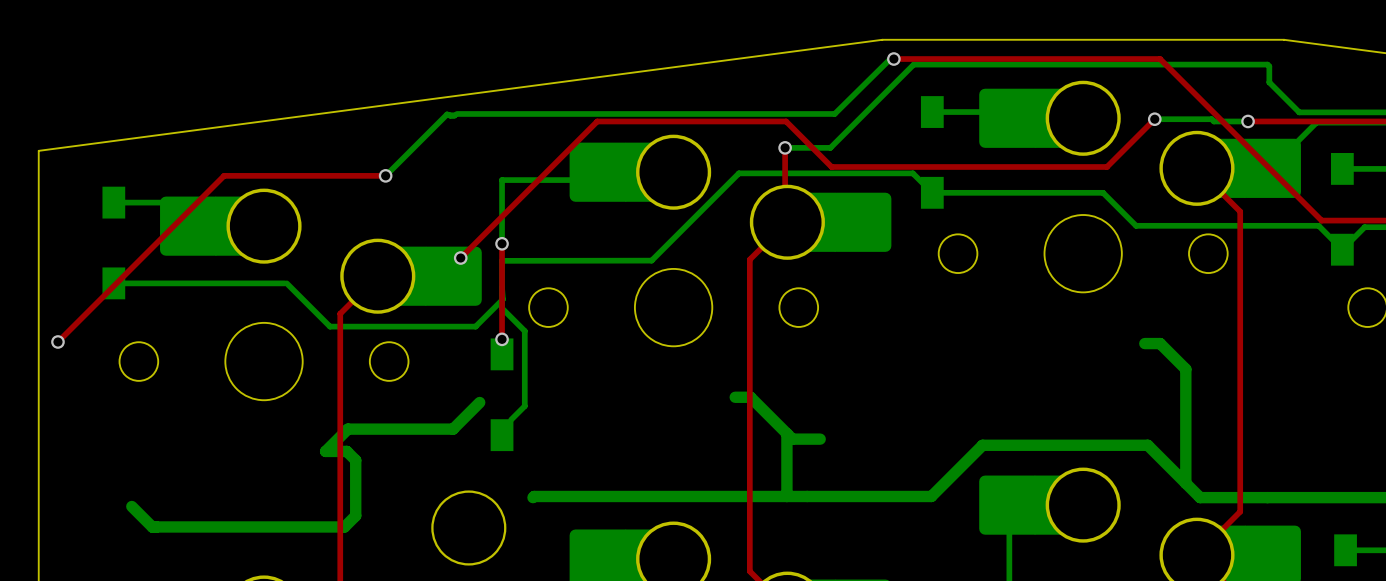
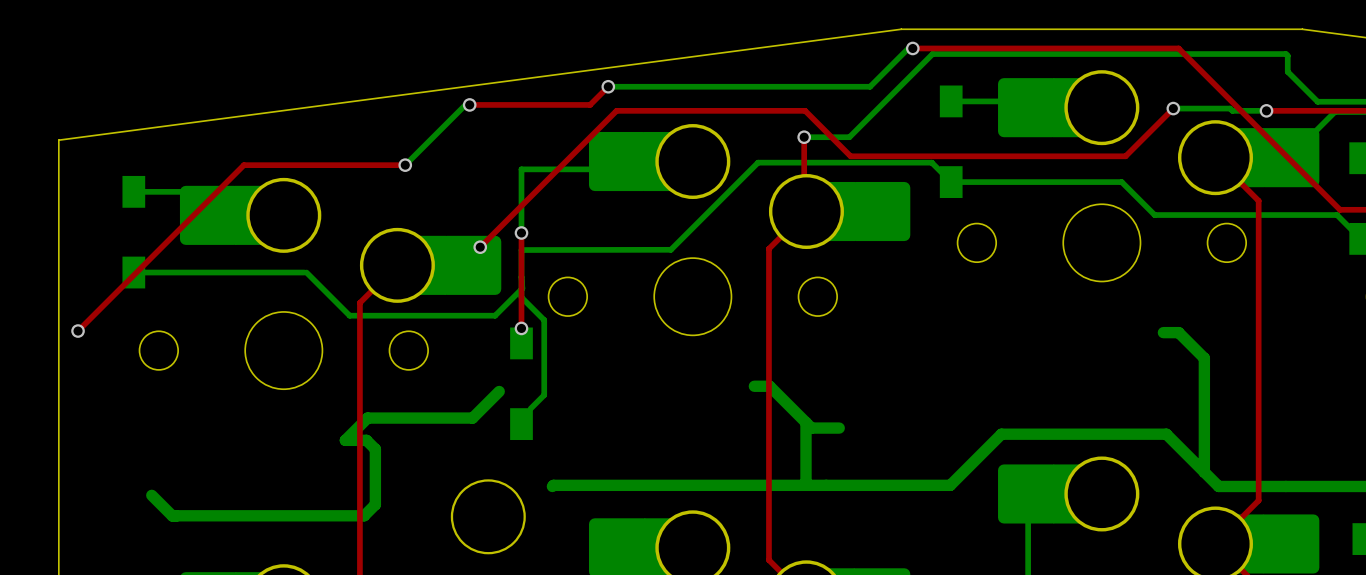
bottom track: none -> (910, 46) (870, 86) (608, 86)
bottom track: (892, 57) (834, 113) (456, 113) -> none
top track: none -> (608, 86) (590, 104) (469, 104)
via: none -> (608, 86)
via: none -> (469, 104)

